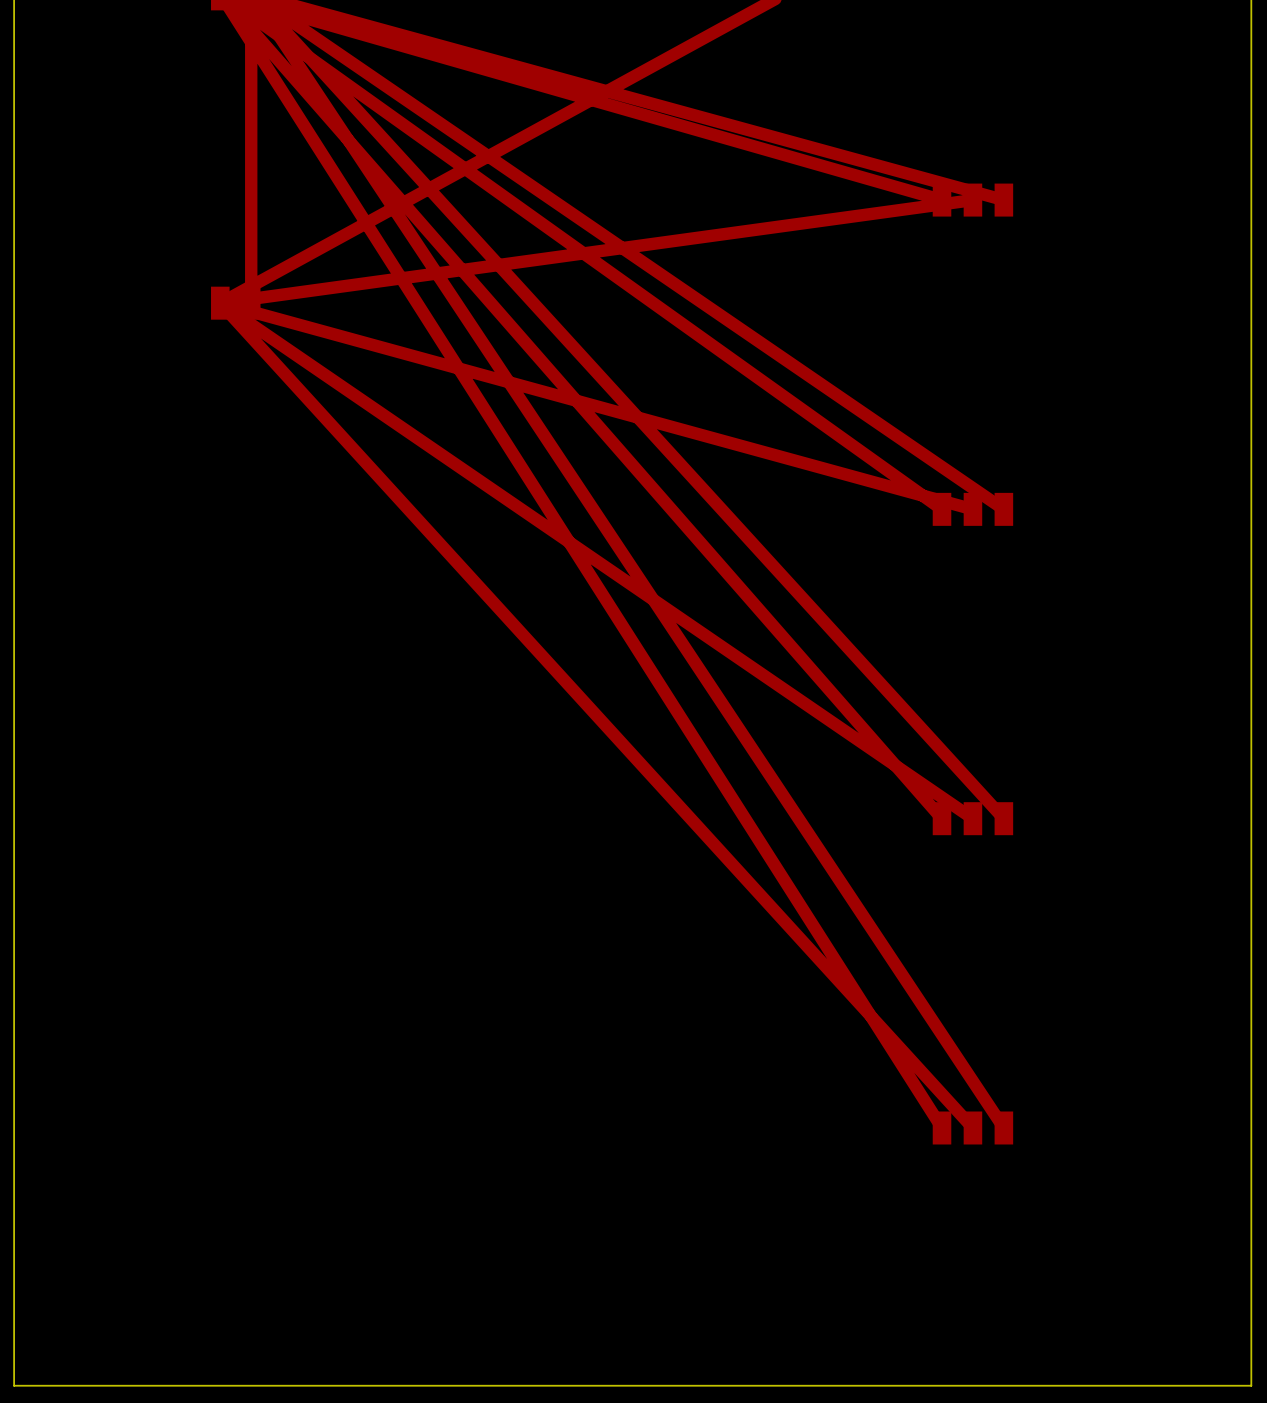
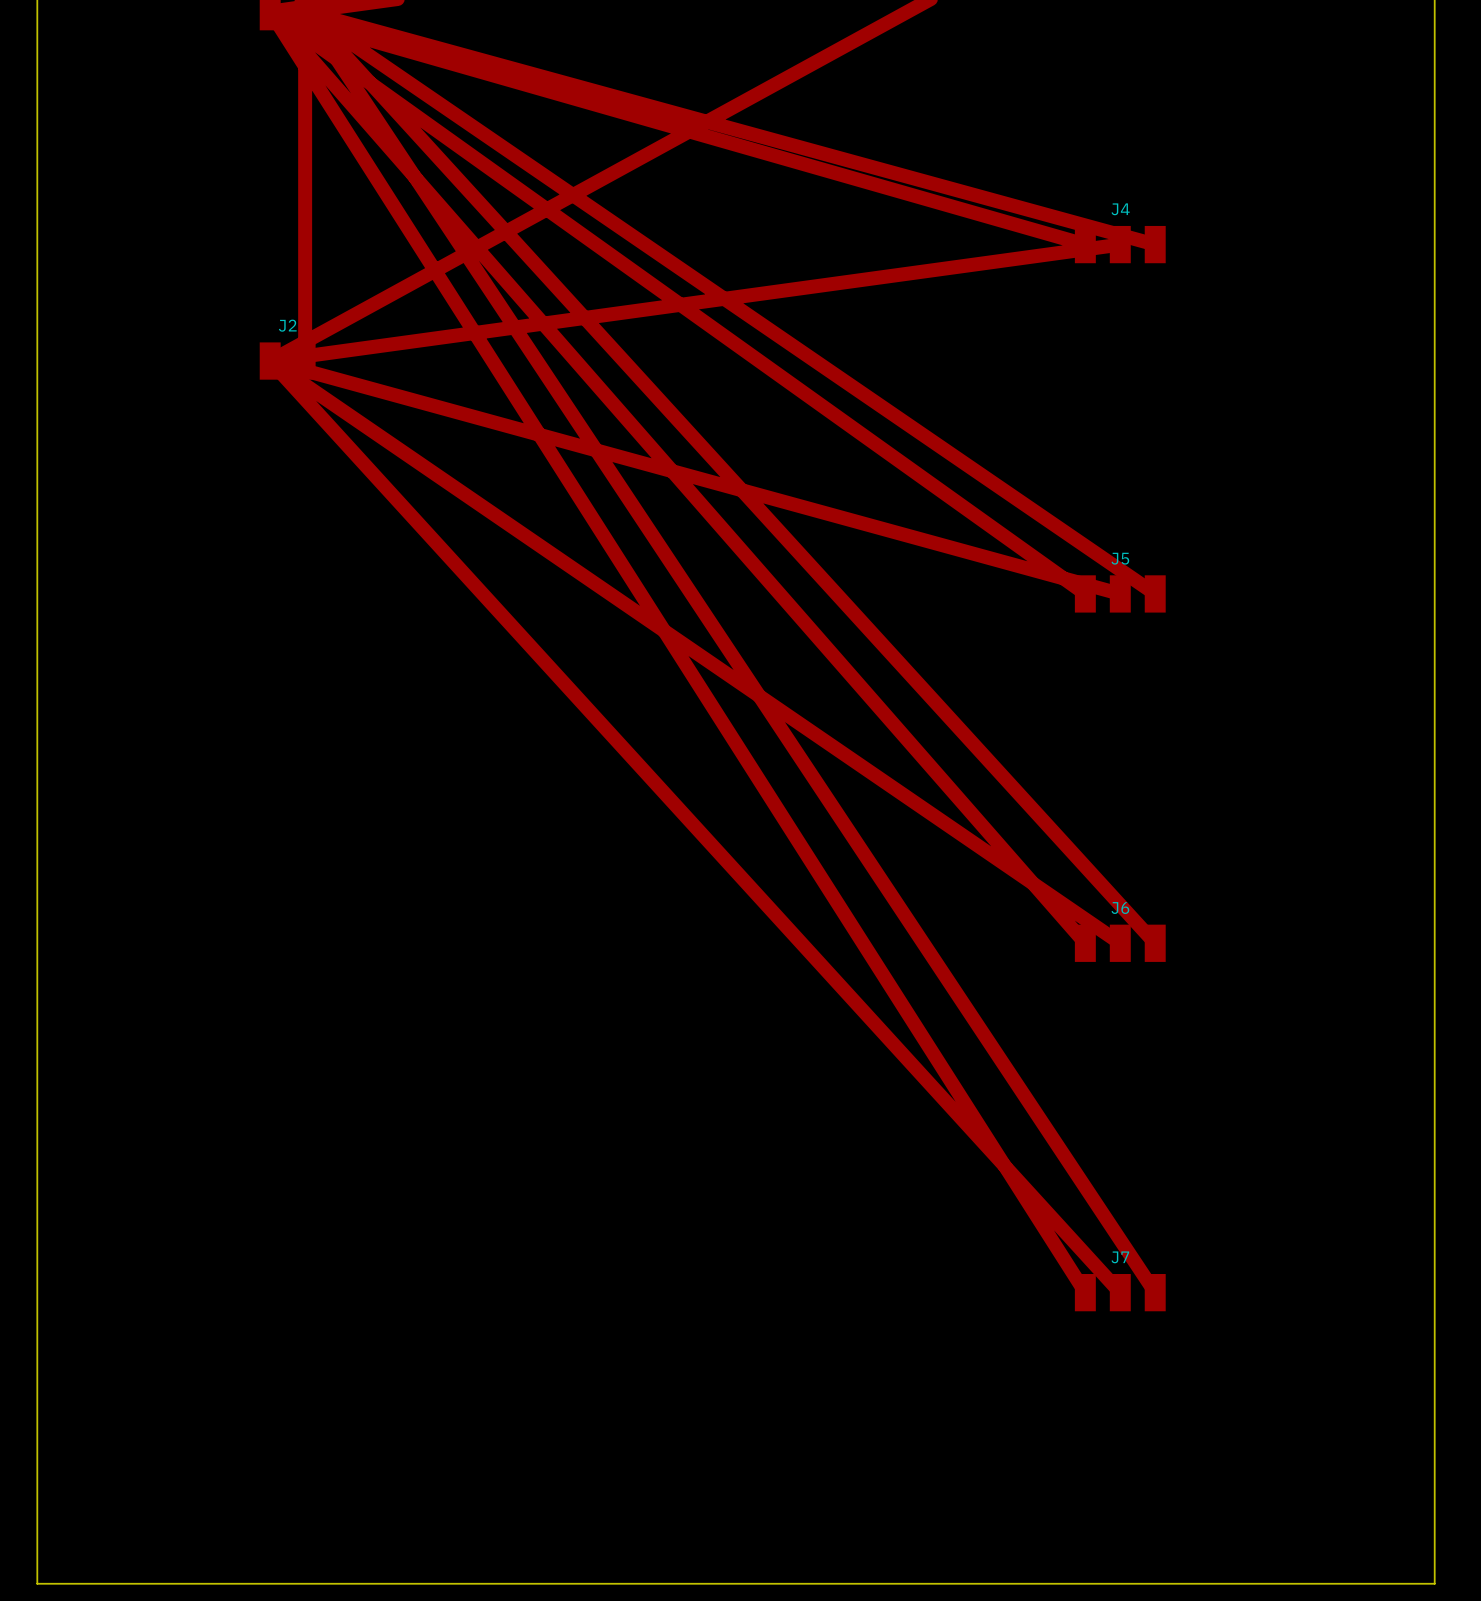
J4 name: none -> J4 (1120, 209)
J2 name: none -> J2 (287, 325)
J5 name: none -> J5 (1120, 558)
J6 name: none -> J6 (1120, 908)
J7 name: none -> J7 (1120, 1257)

